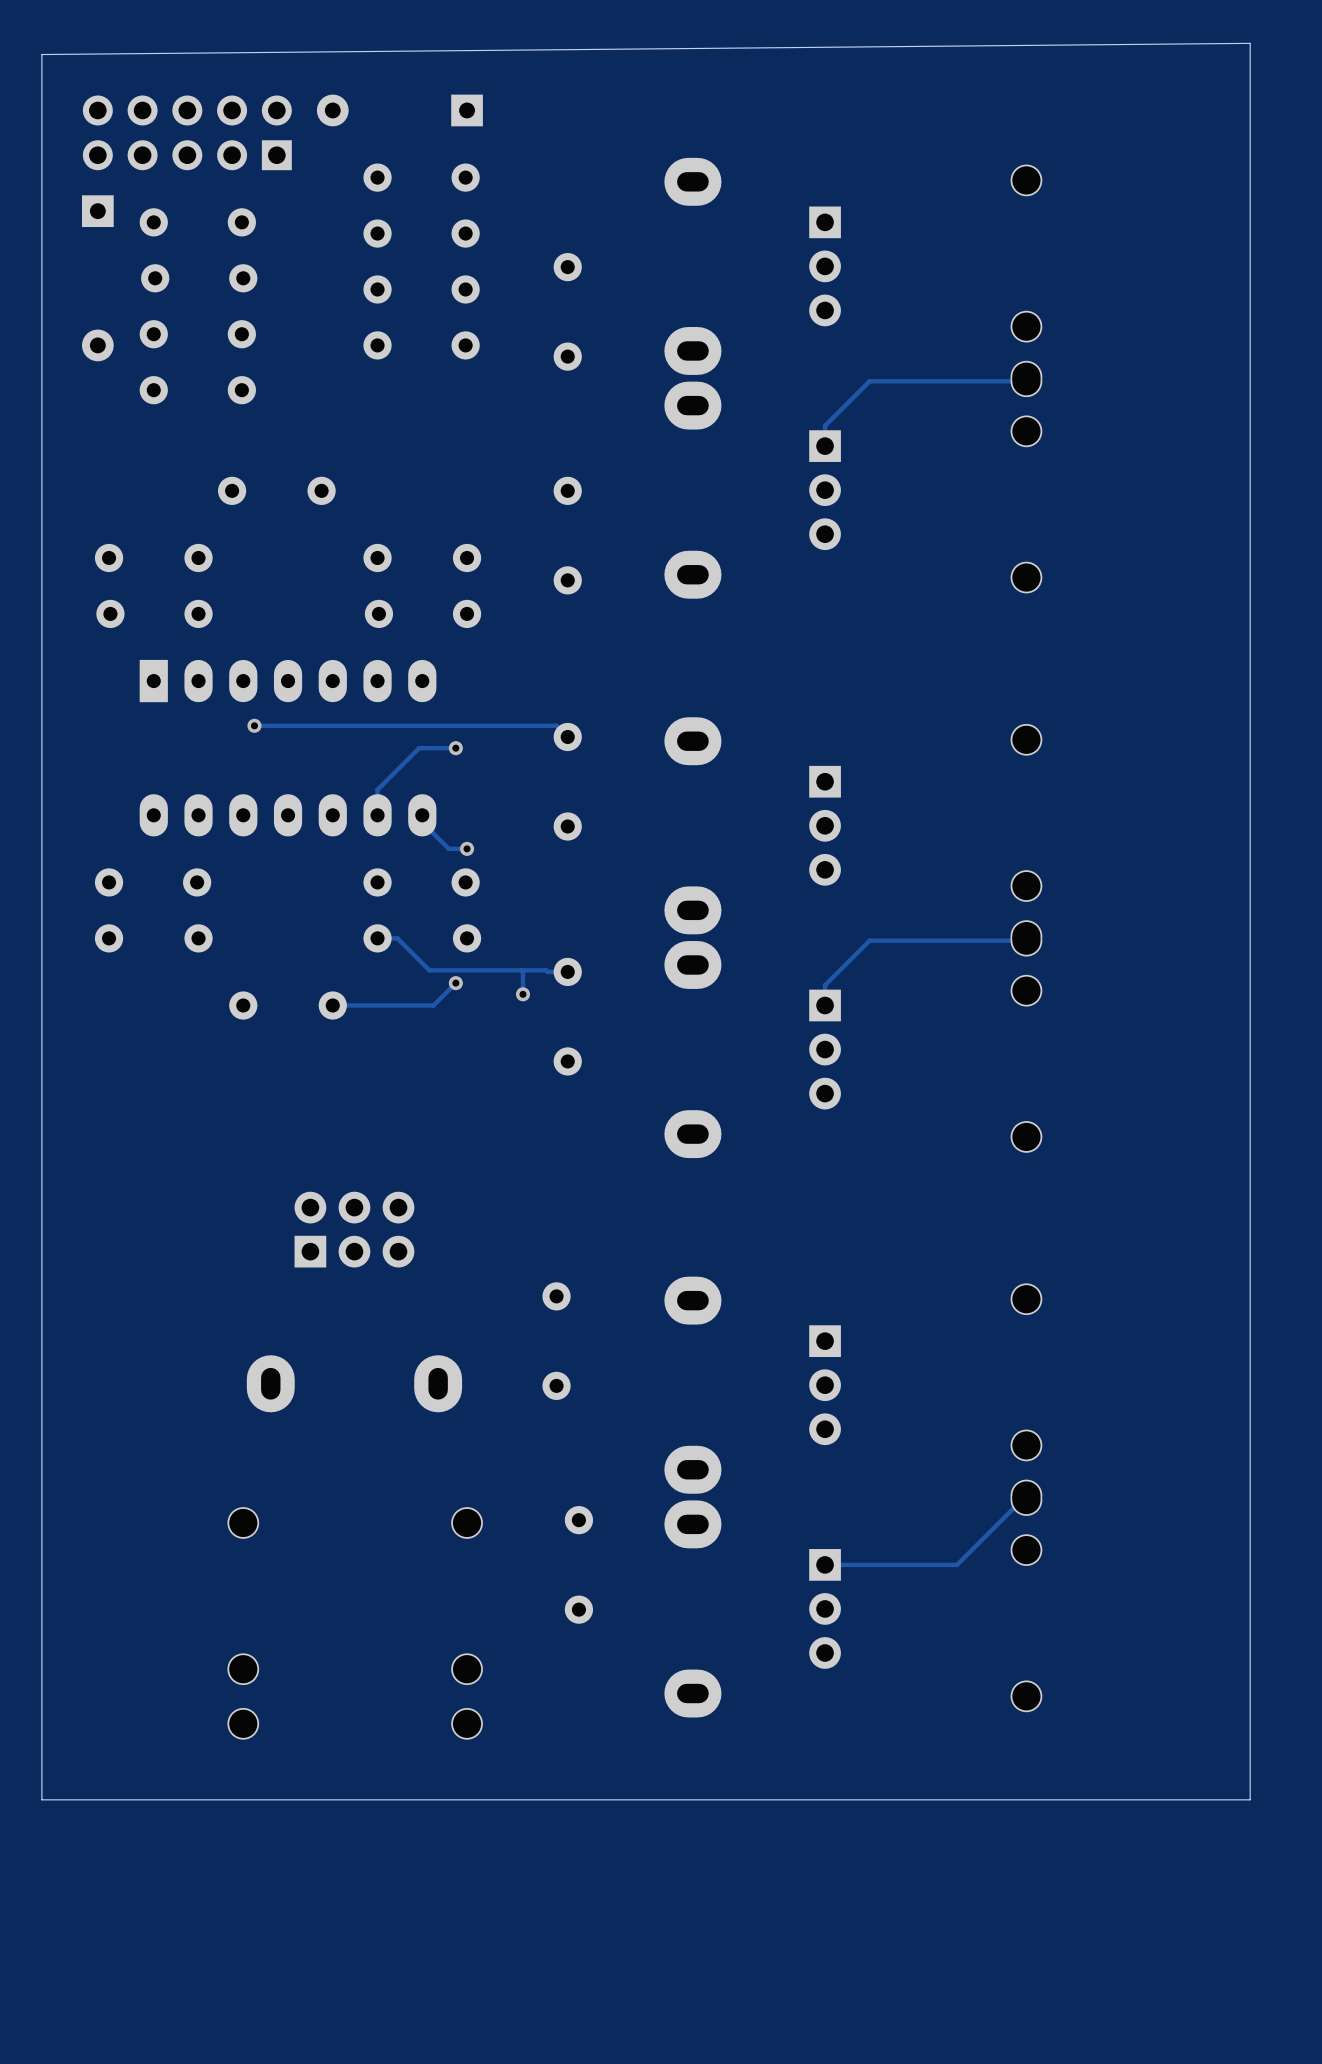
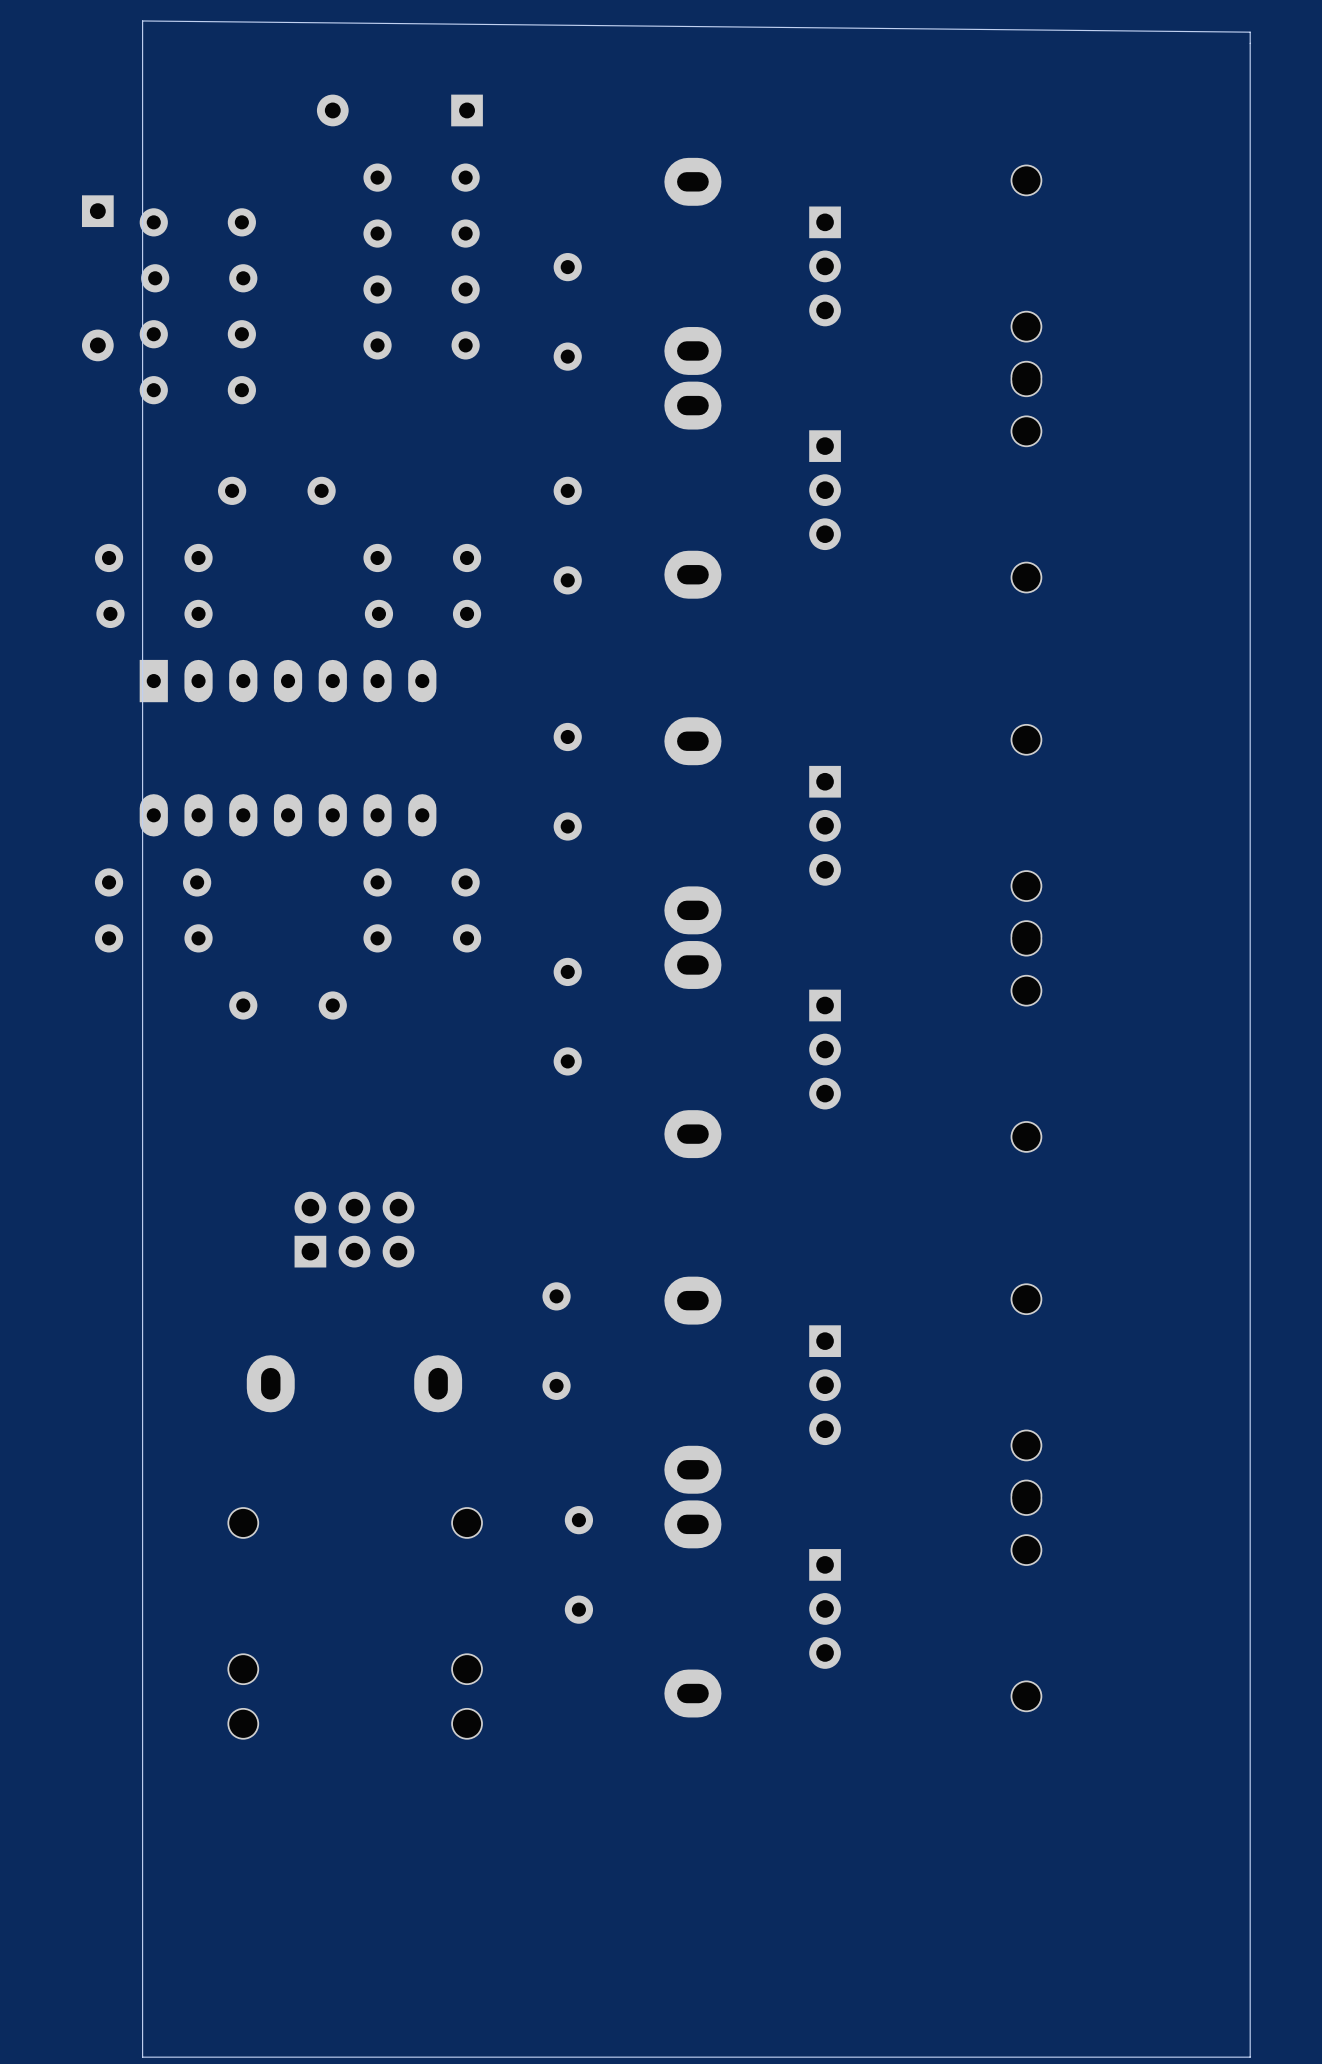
board edge: (1250, 43) (41, 54) (41, 1799) (1250, 1799) -> (1250, 43) (1250, 32) (142, 20) (142, 2057) (1250, 2057) (1250, 1799)
part: (187, 132) -> none
track: (1026, 381) (869, 381) (825, 425) (825, 446) -> none
track: (254, 725) (556, 725) (567, 736) -> none
via: (254, 725) -> none
track: (455, 748) (419, 748) (377, 789) (377, 815) -> none
via: (455, 748) -> none
track: (422, 815) (422, 822) (448, 848) (467, 848) -> none
via: (467, 848) -> none
track: (377, 938) (397, 938) (429, 970) (567, 971) -> none
track: (1026, 940) (869, 940) (825, 985) (825, 1005) -> none
track: (521, 970) (522, 994) -> none
track: (455, 983) (433, 1005) (332, 1005) -> none
via: (455, 983) -> none
via: (522, 994) -> none
track: (1026, 1495) (957, 1564) (825, 1564) -> none

